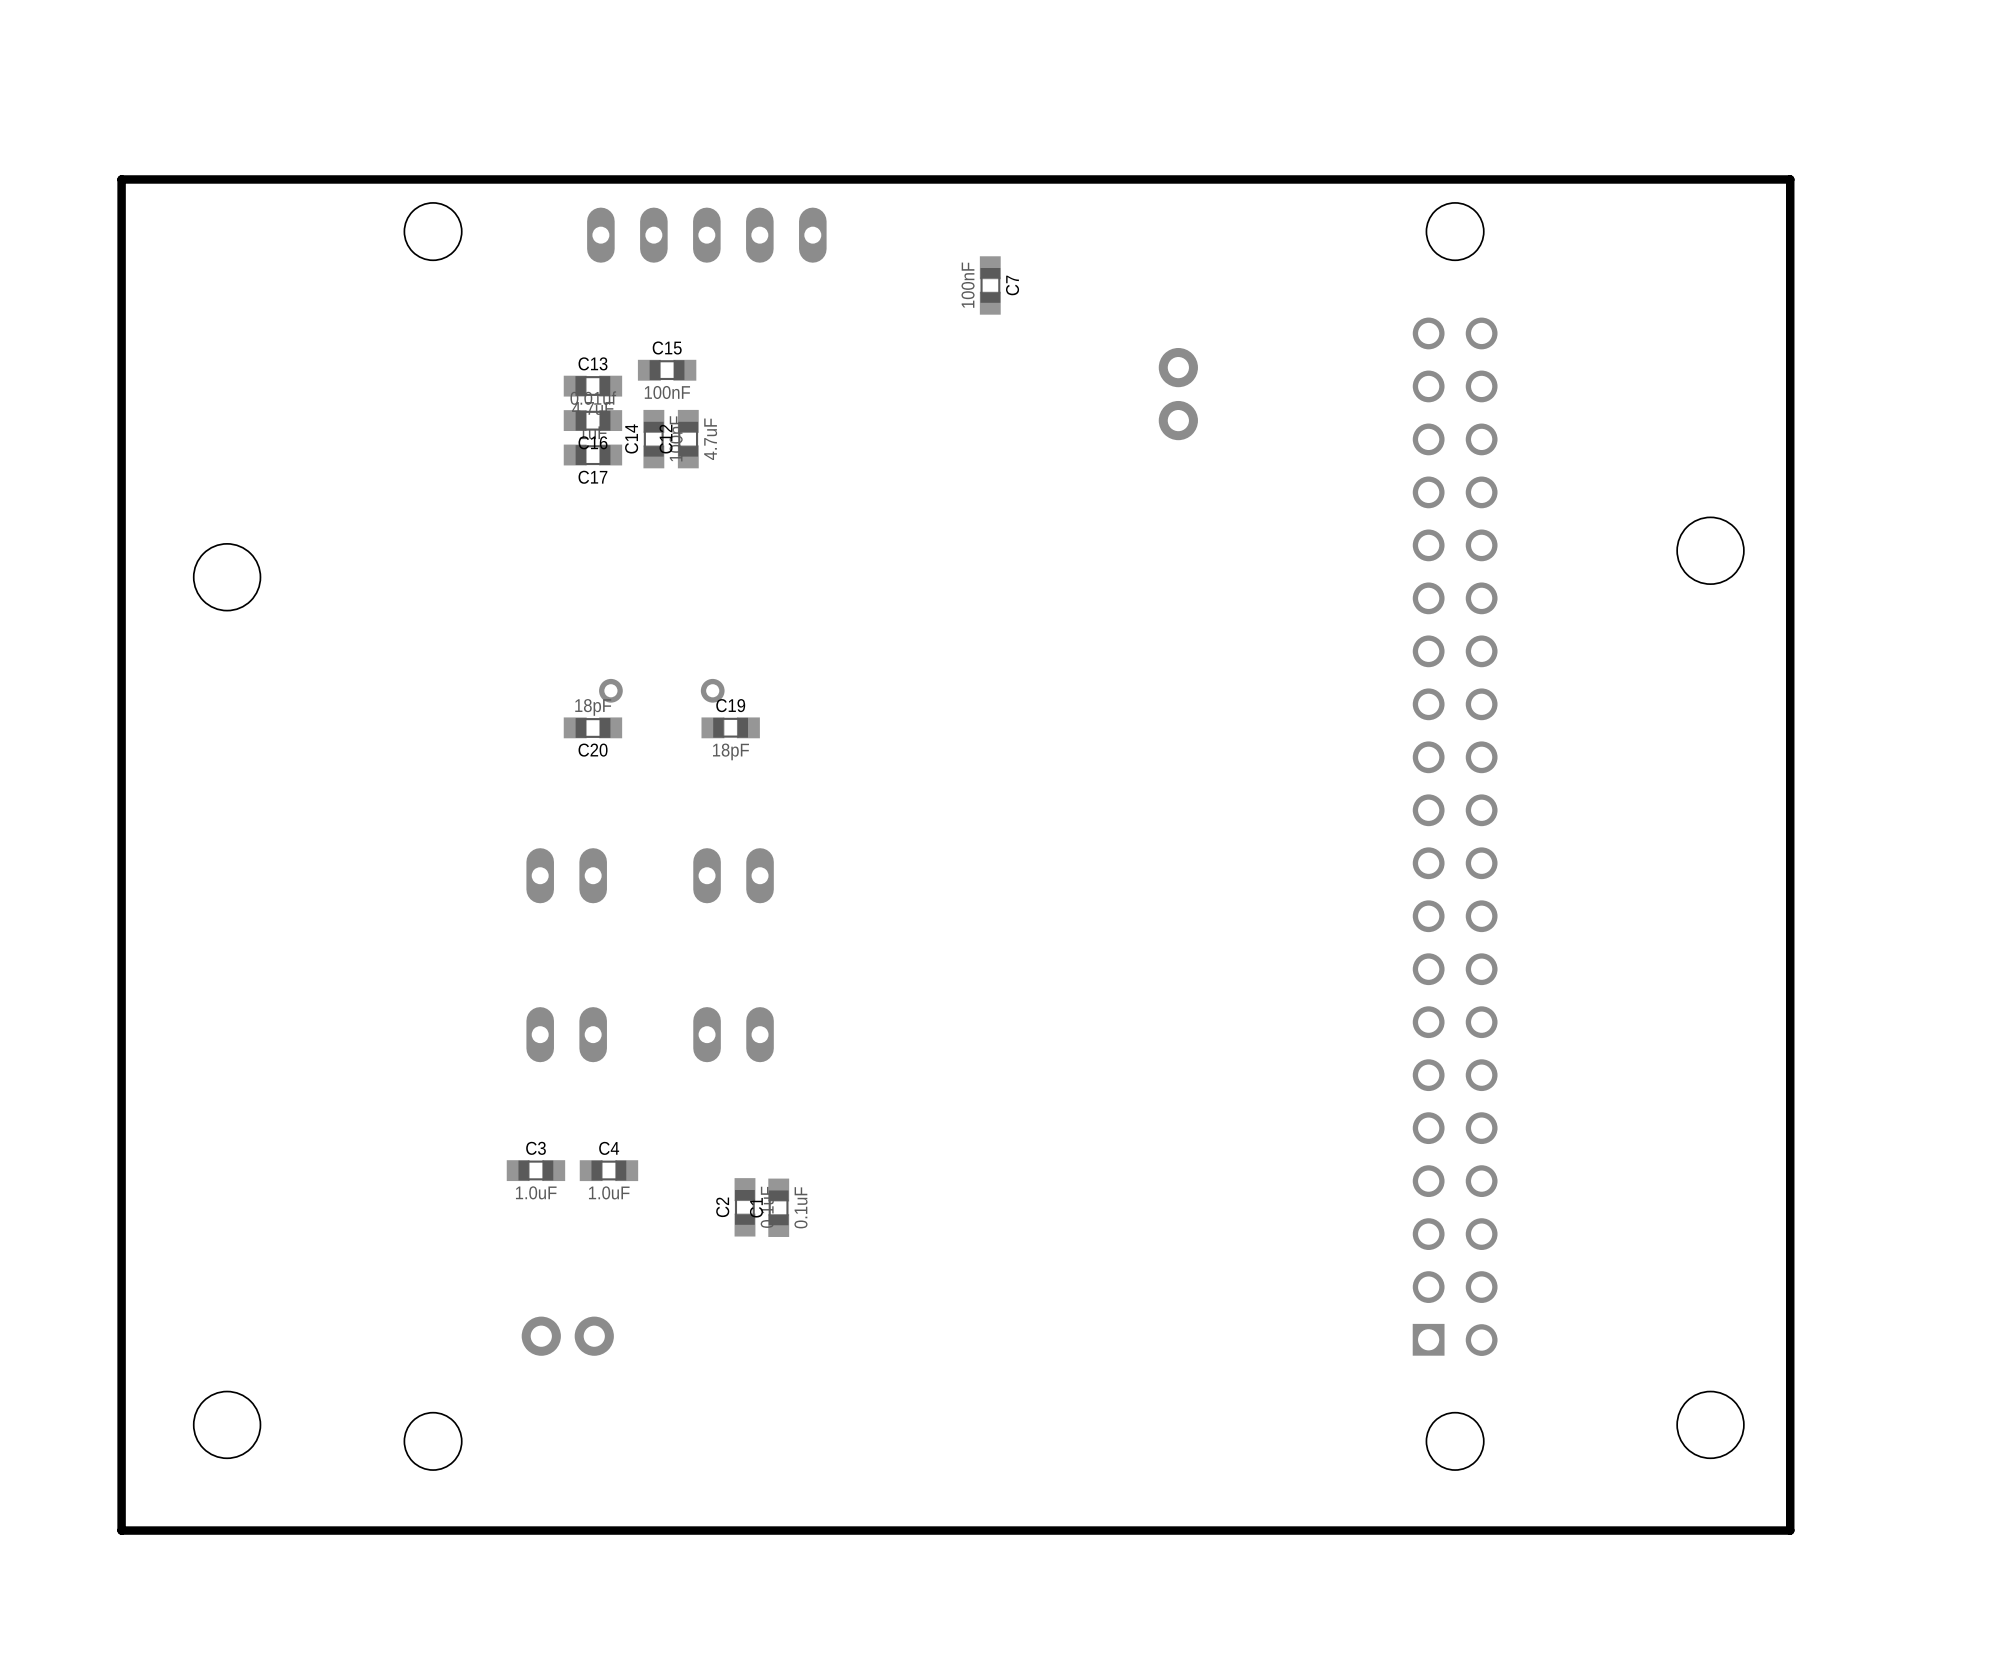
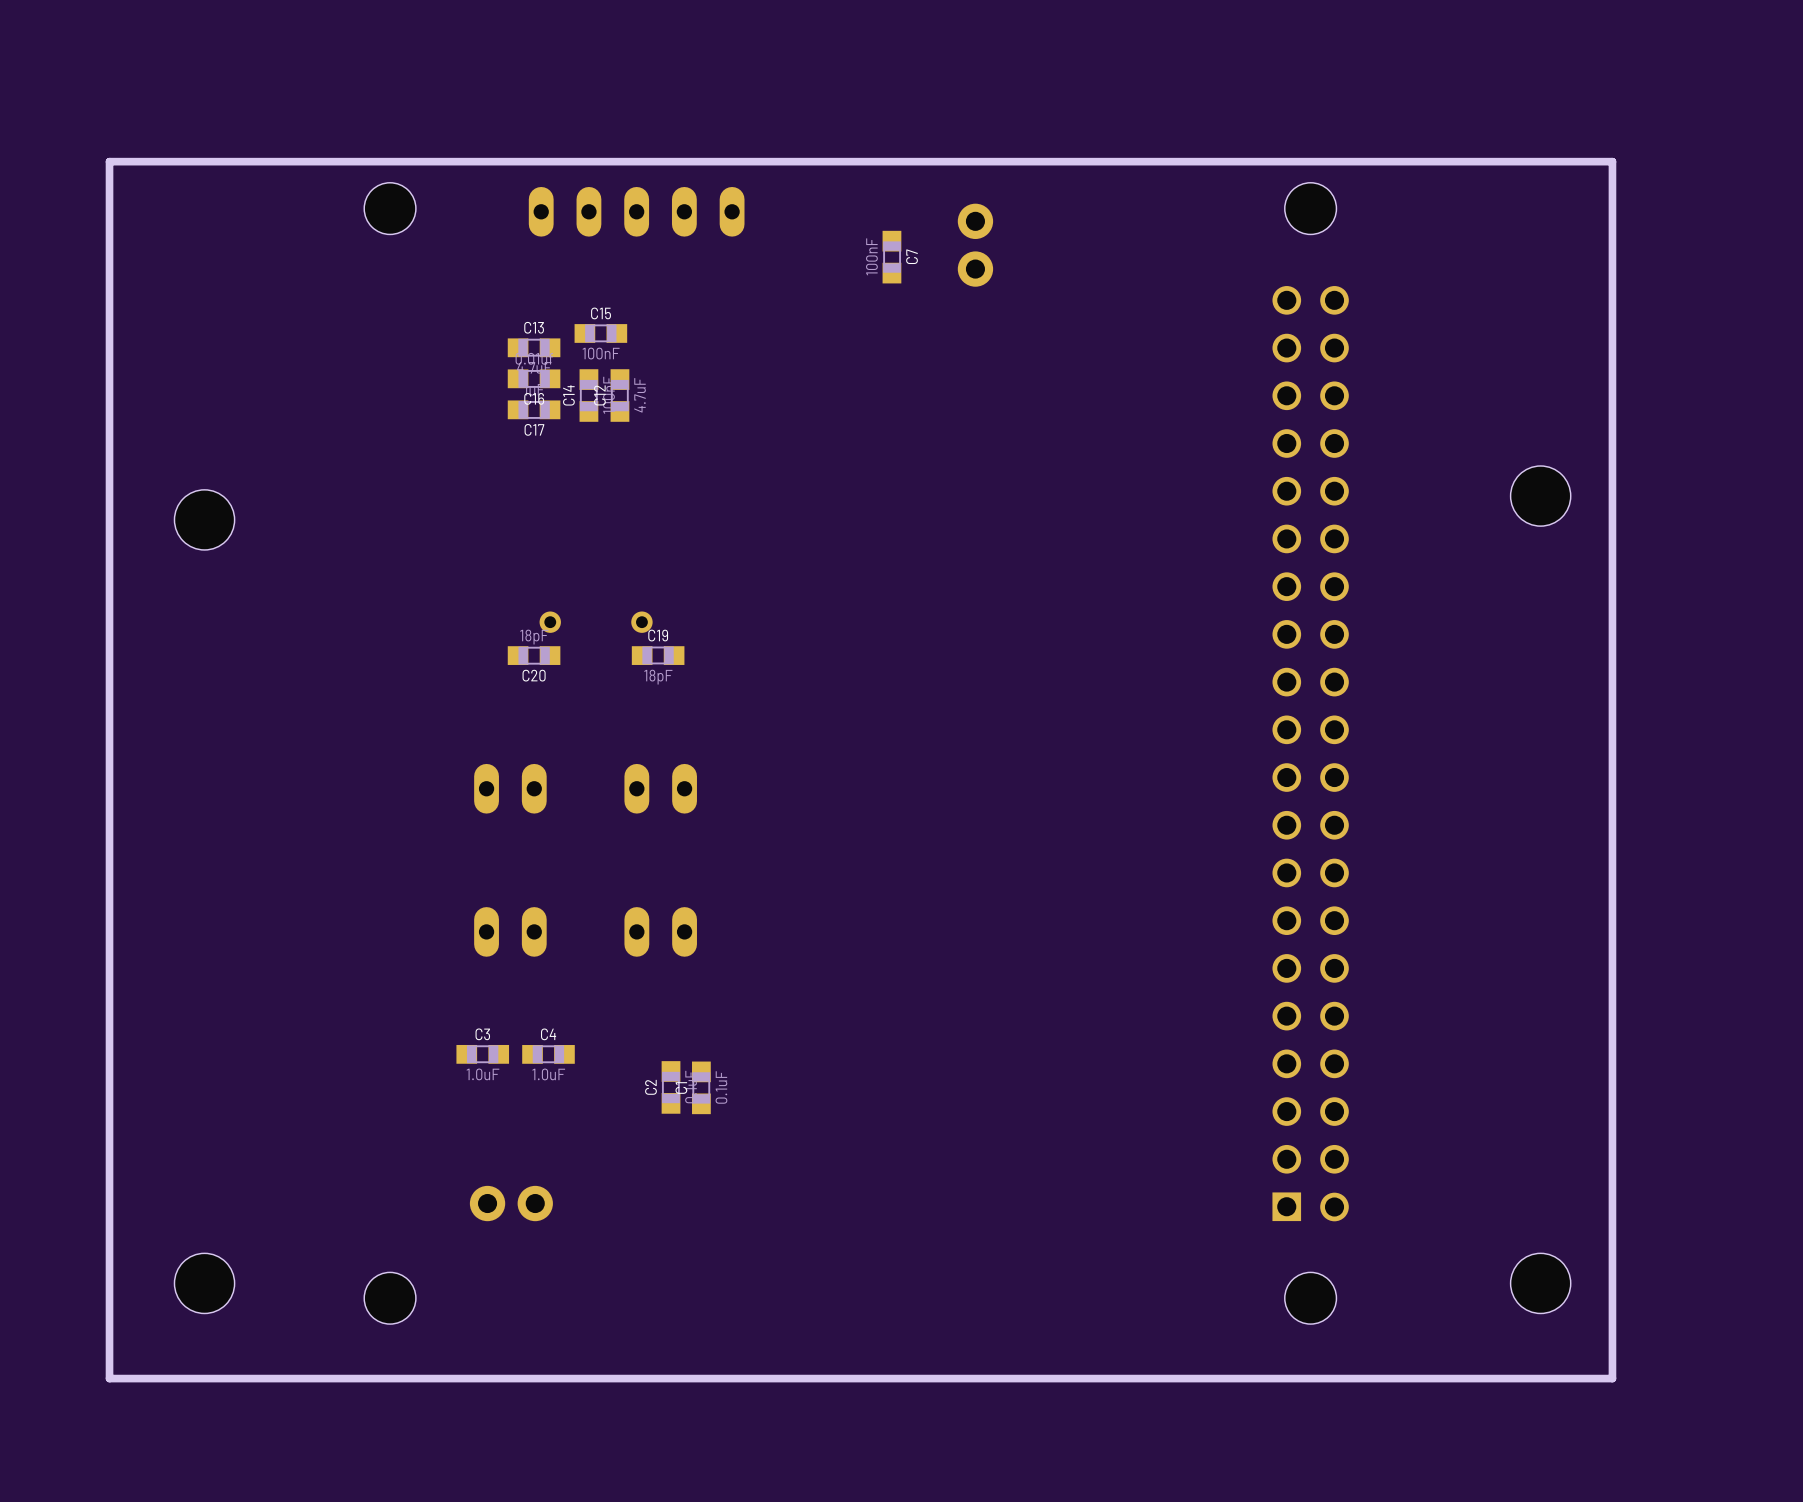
part position: (1178, 394) -> (975, 245)

